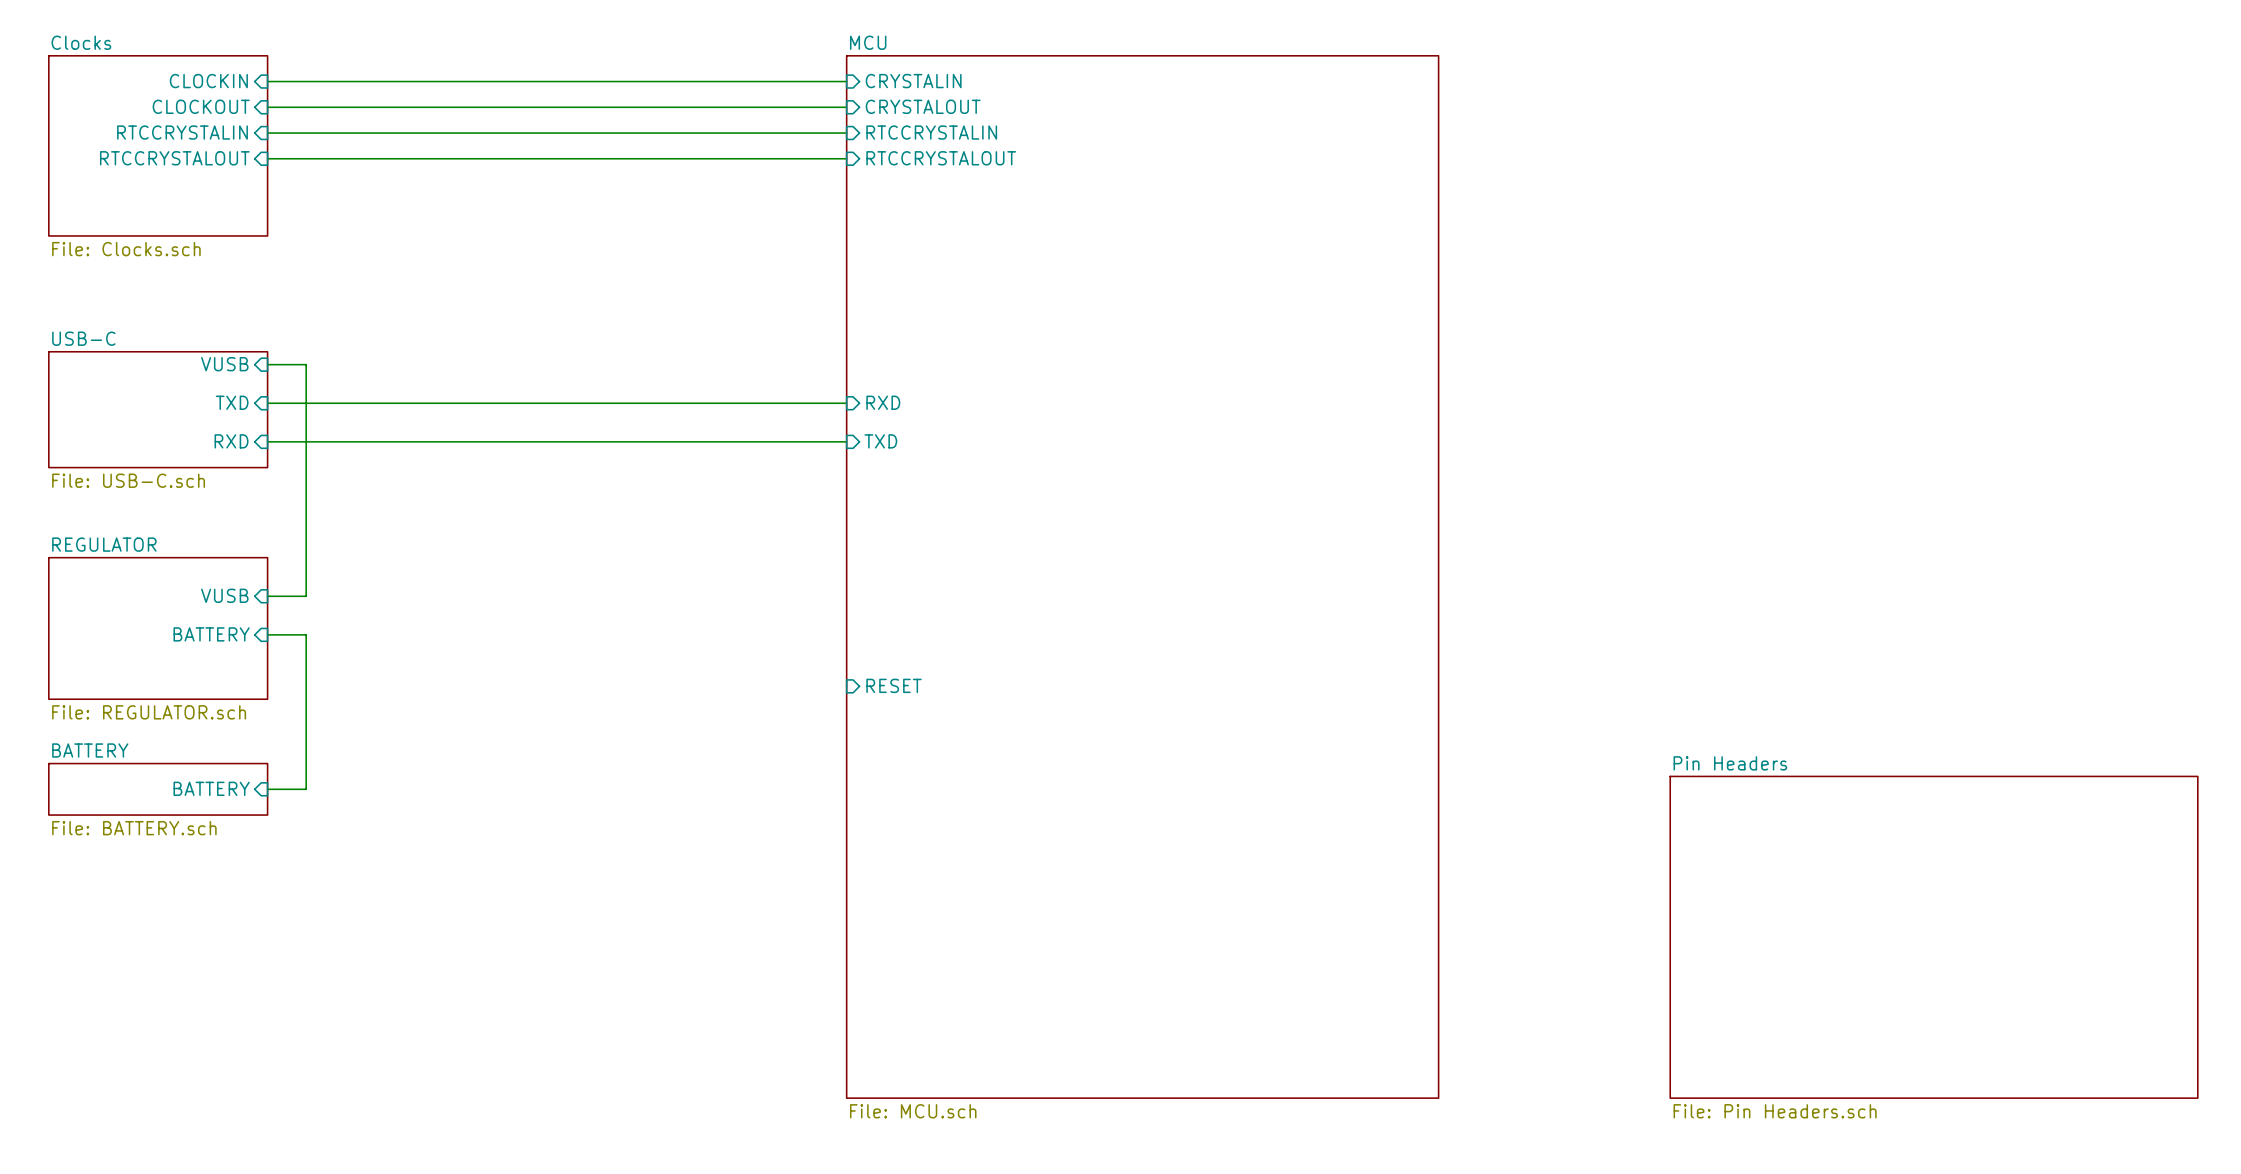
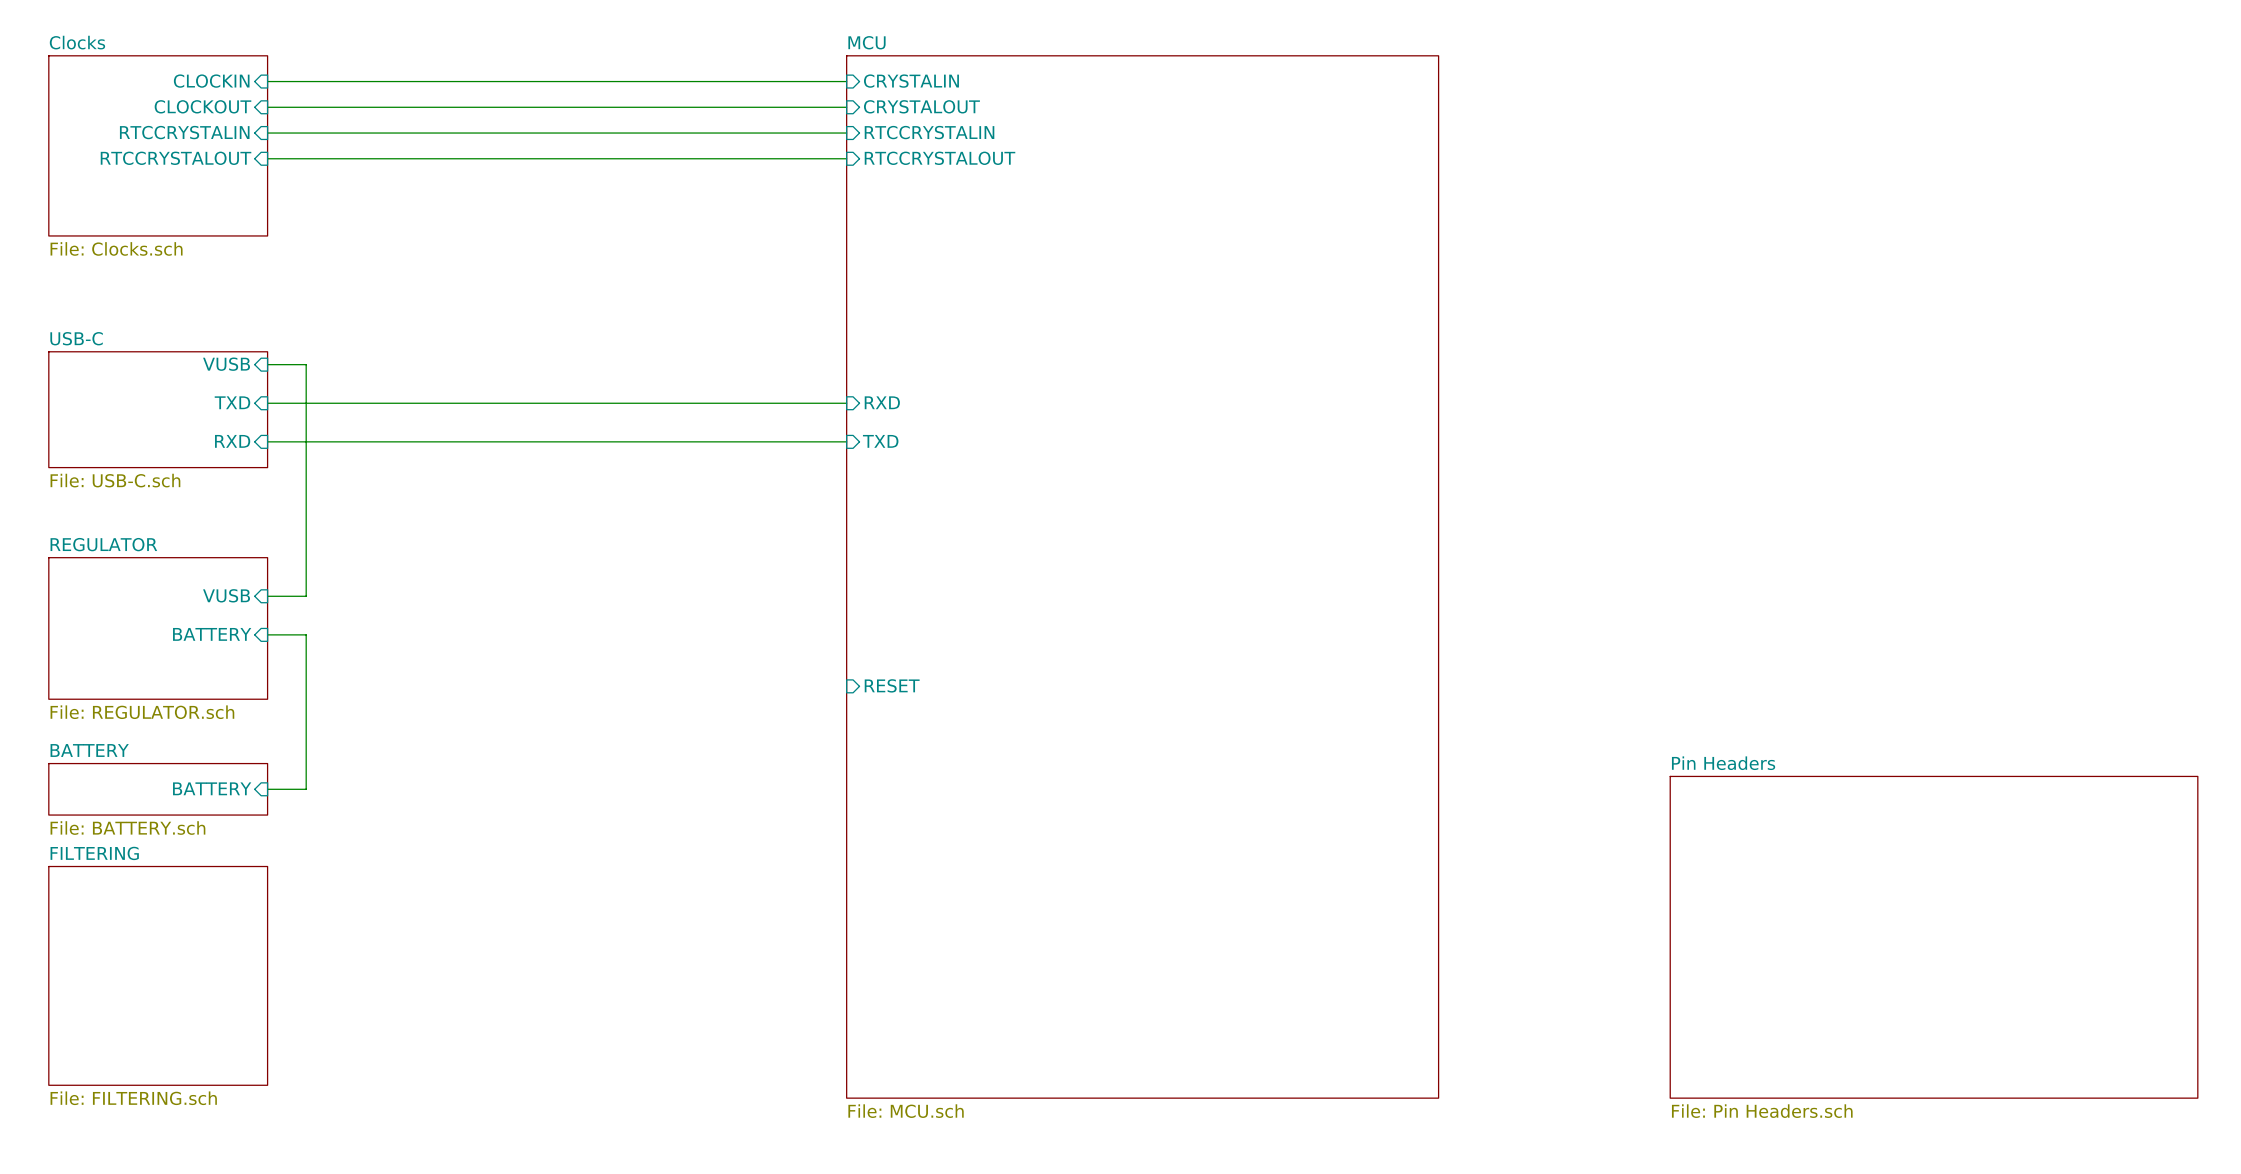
sheet FILTERING: none -> File: FILTERING.sch (158, 975)

